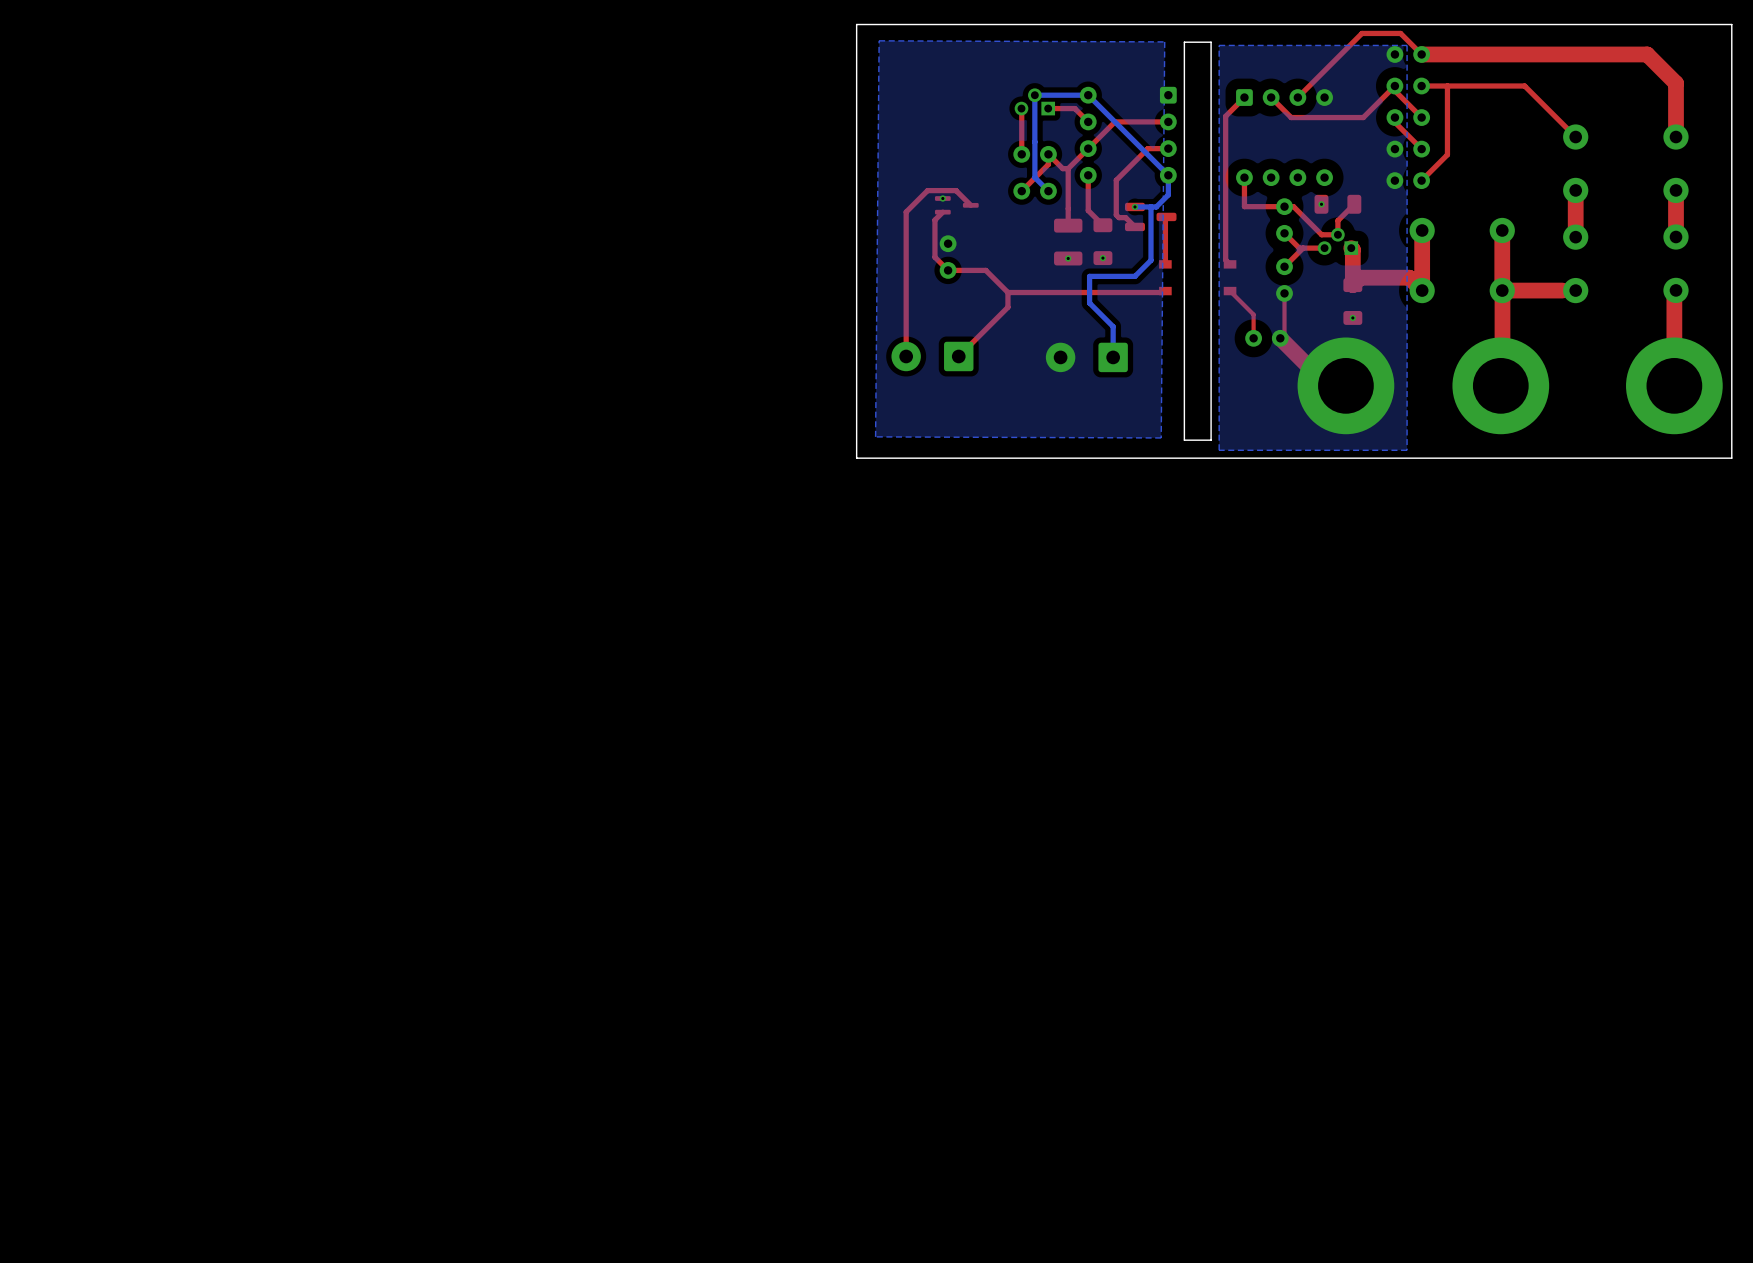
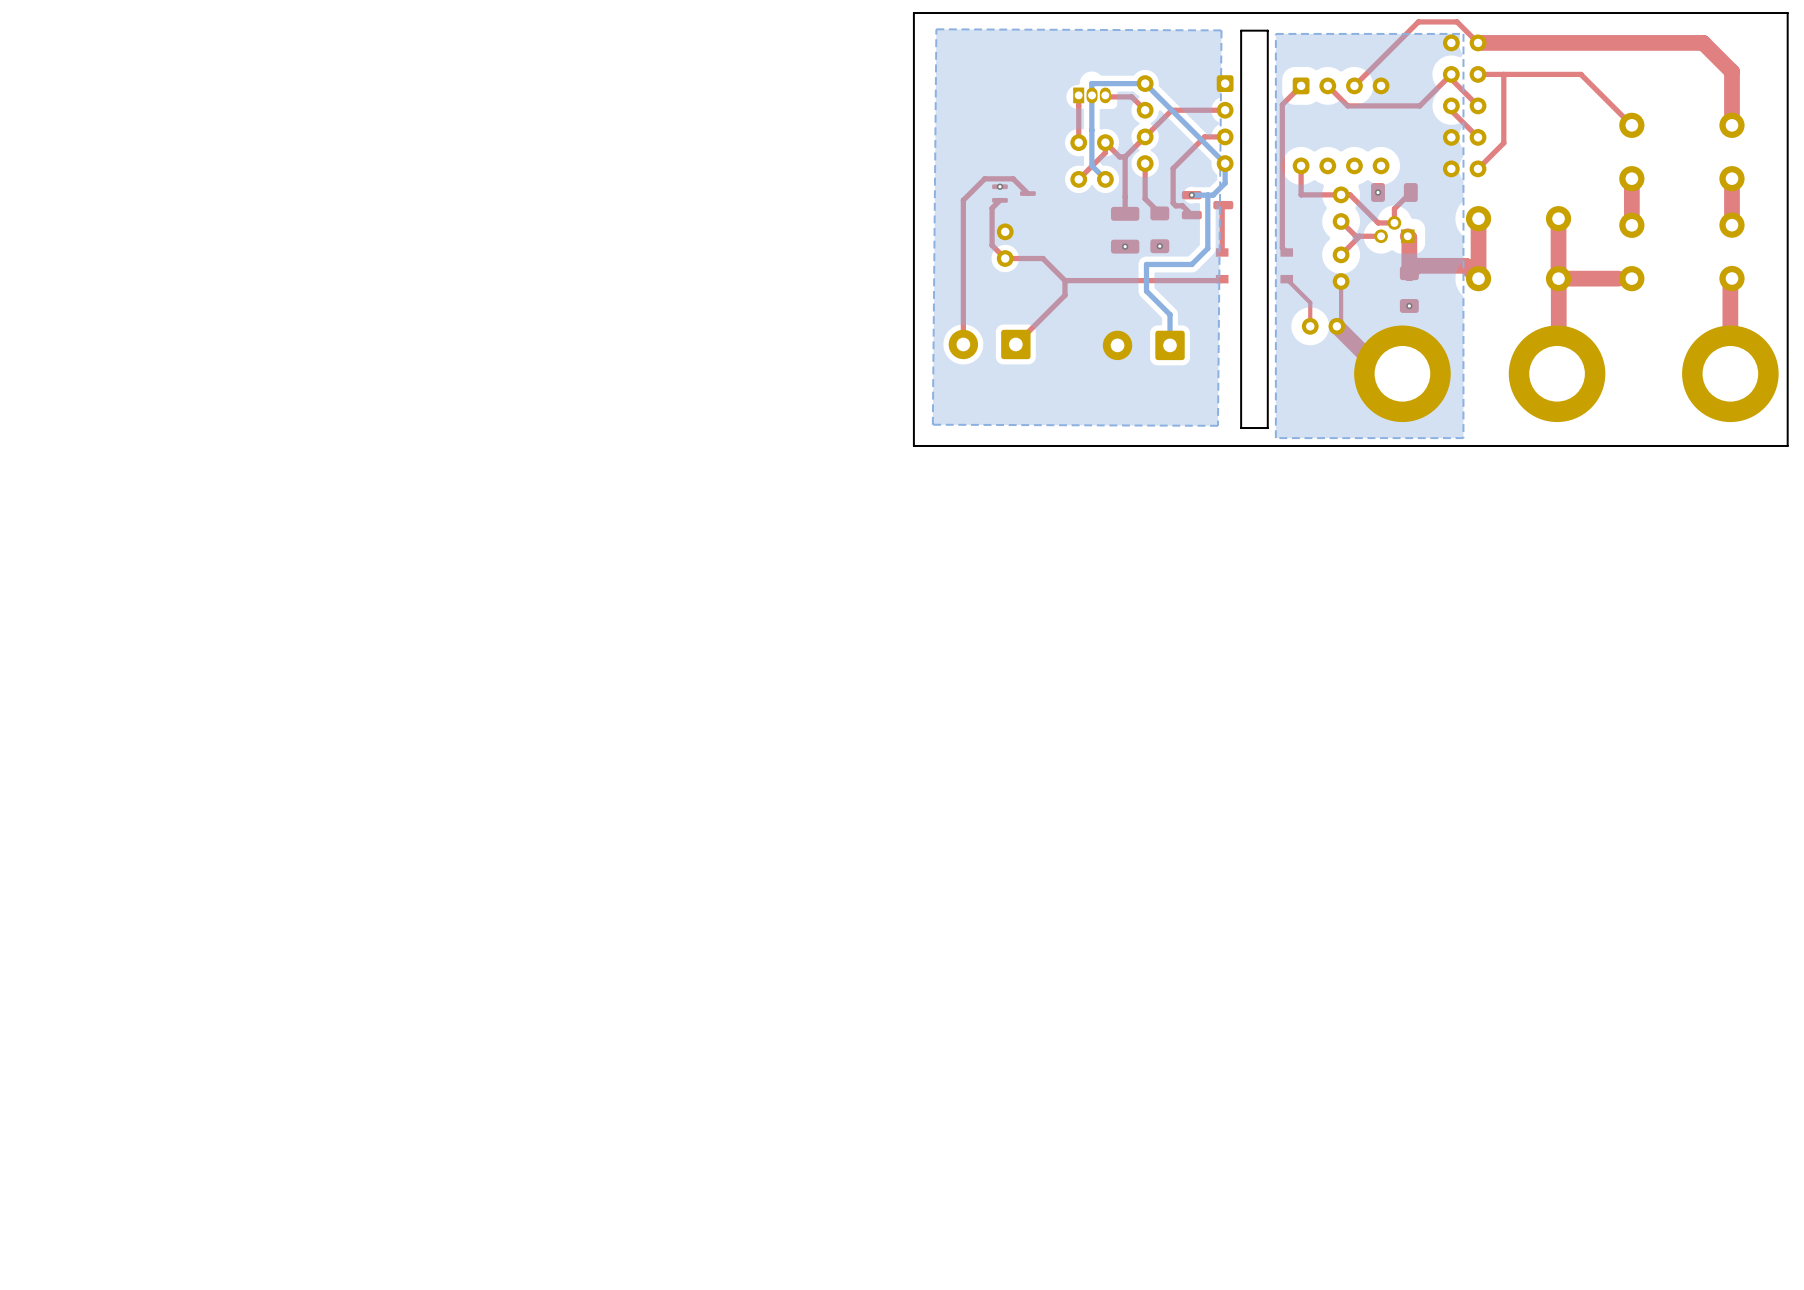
part footprint: [1014, 88, 1056, 116] -> [1073, 87, 1111, 104]

